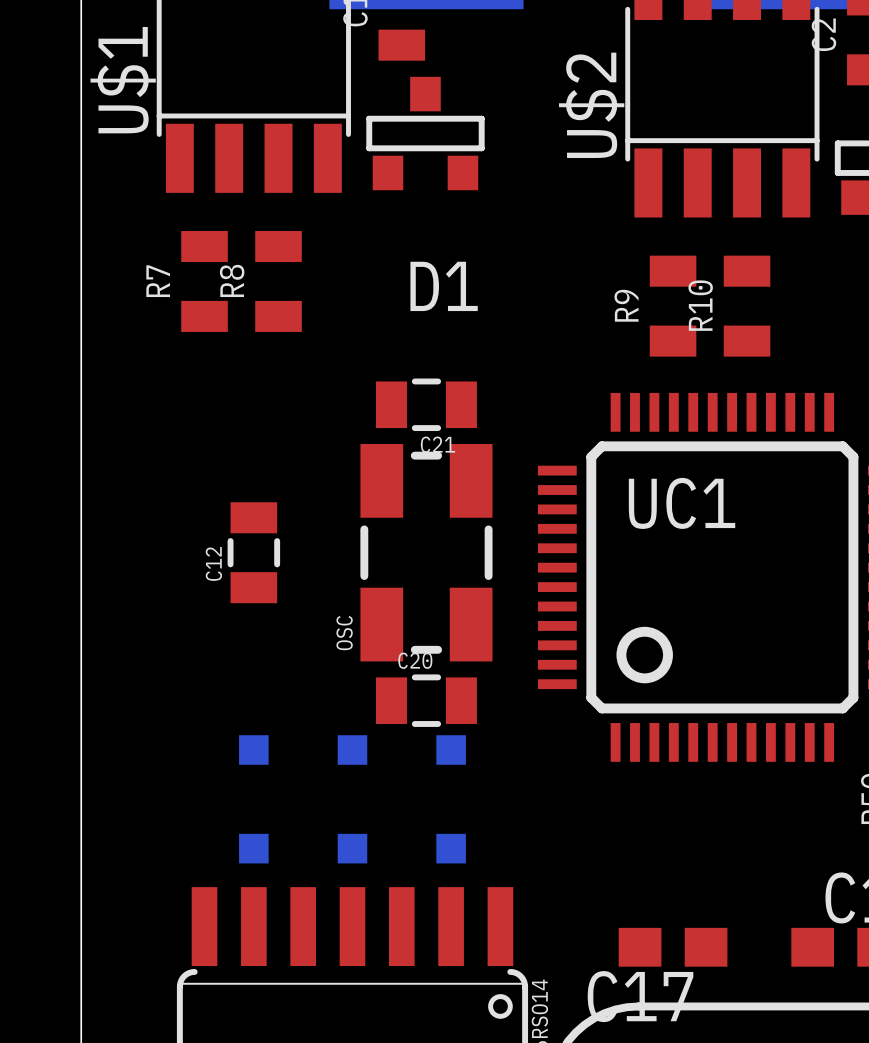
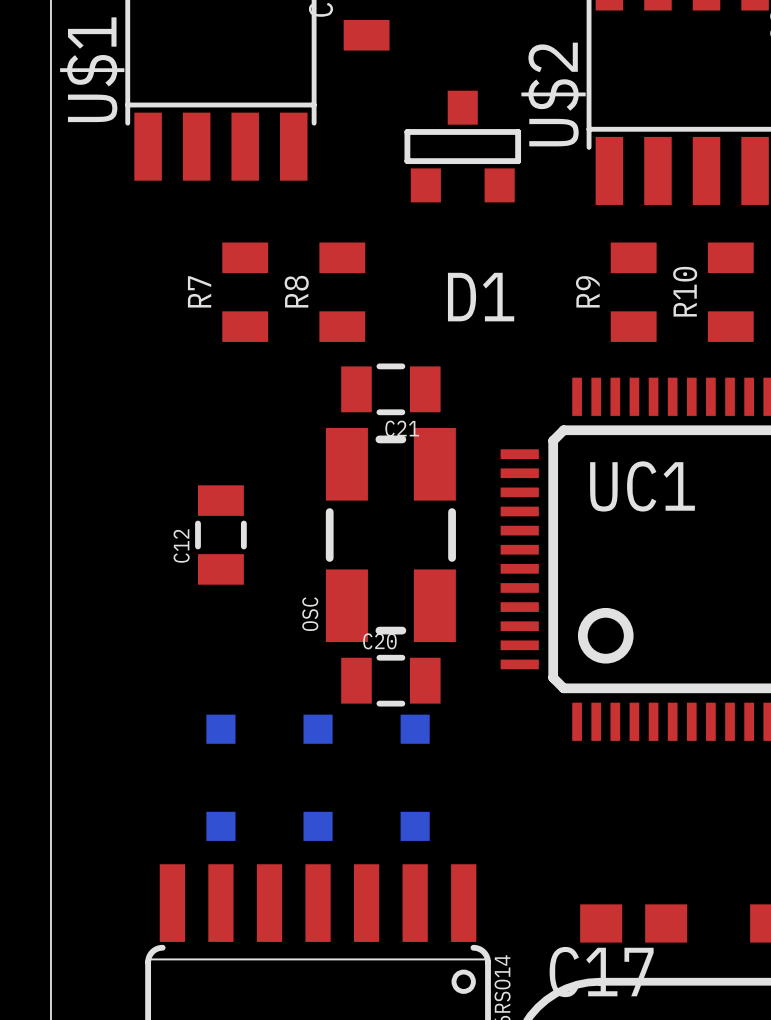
D1 position: (425, 133) -> (462, 146)
R7 position: (204, 281) -> (245, 292)
R8 position: (278, 281) -> (342, 292)
R10 position: (747, 306) -> (730, 292)

